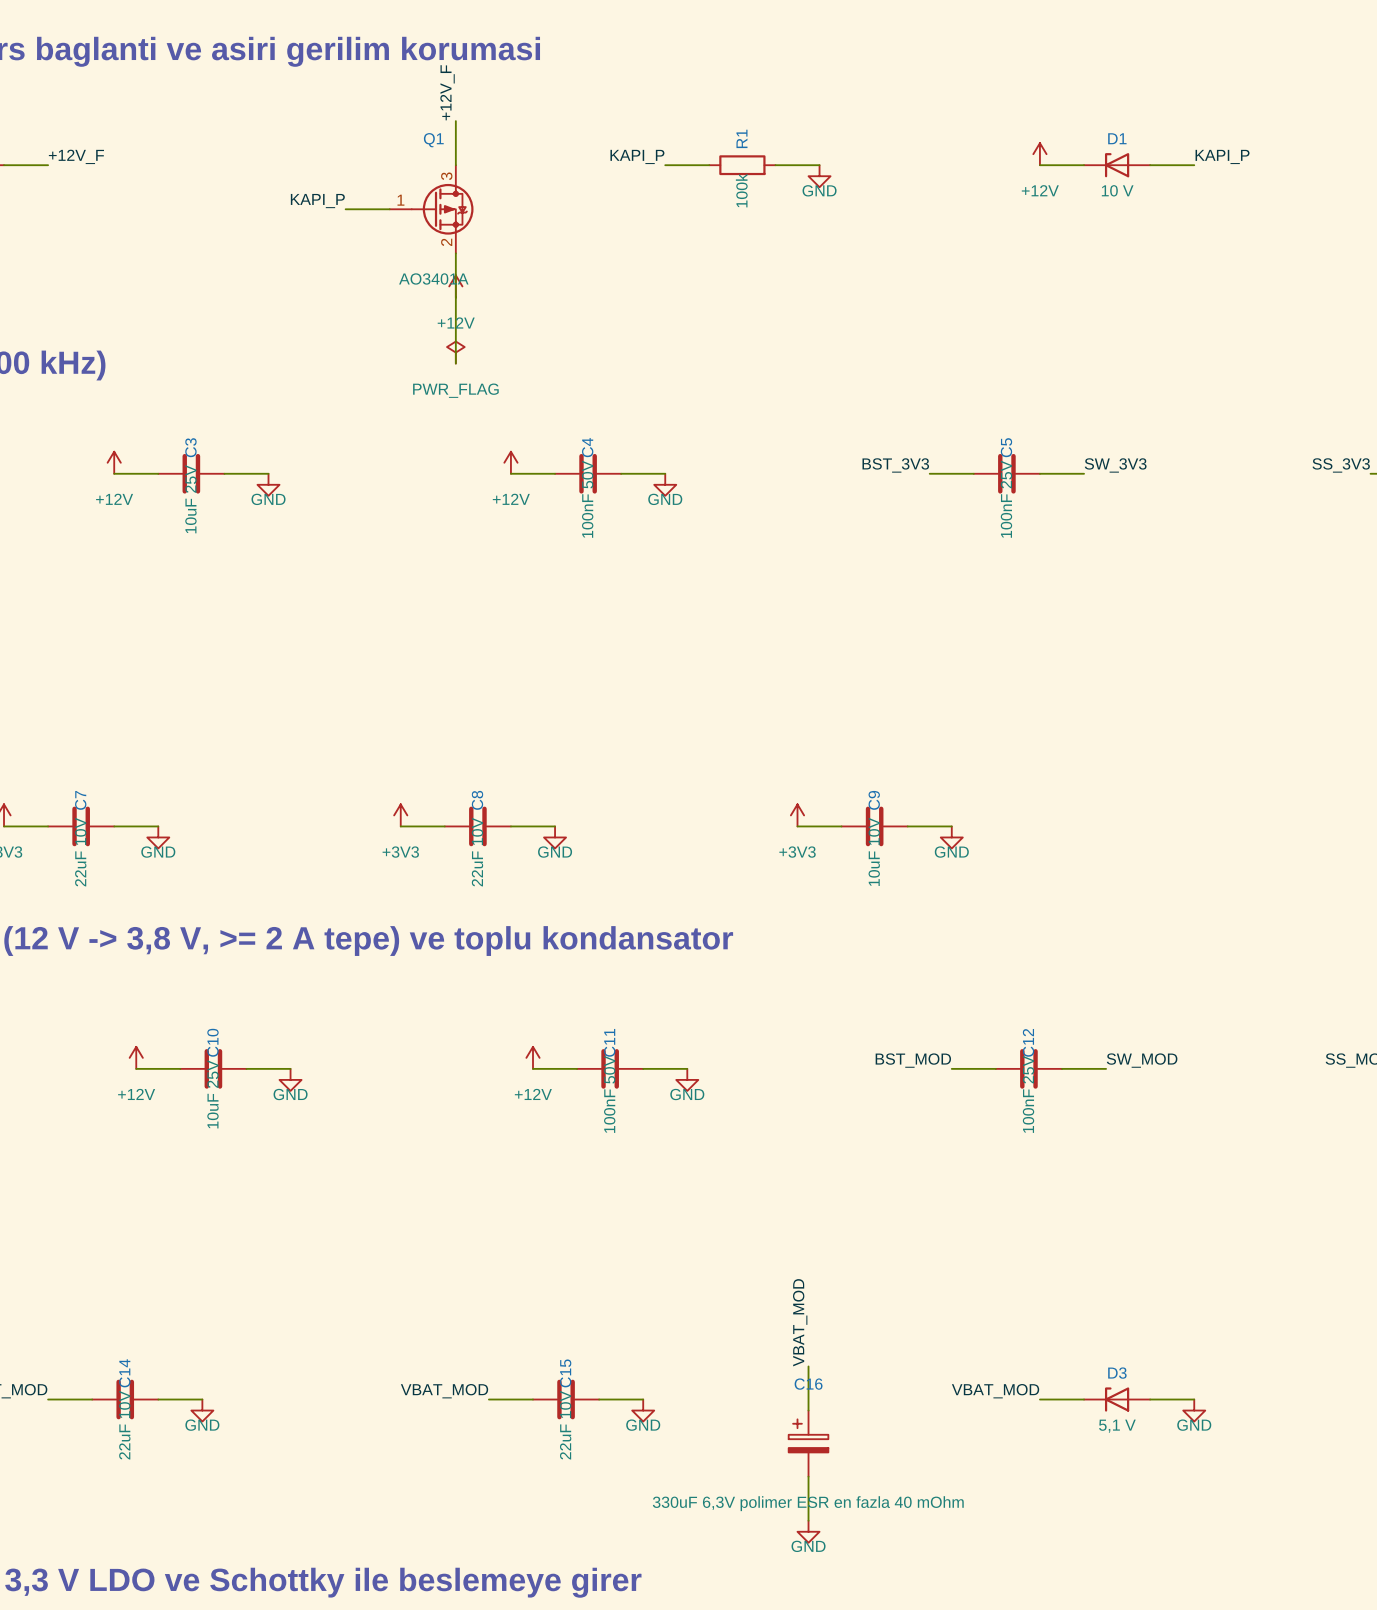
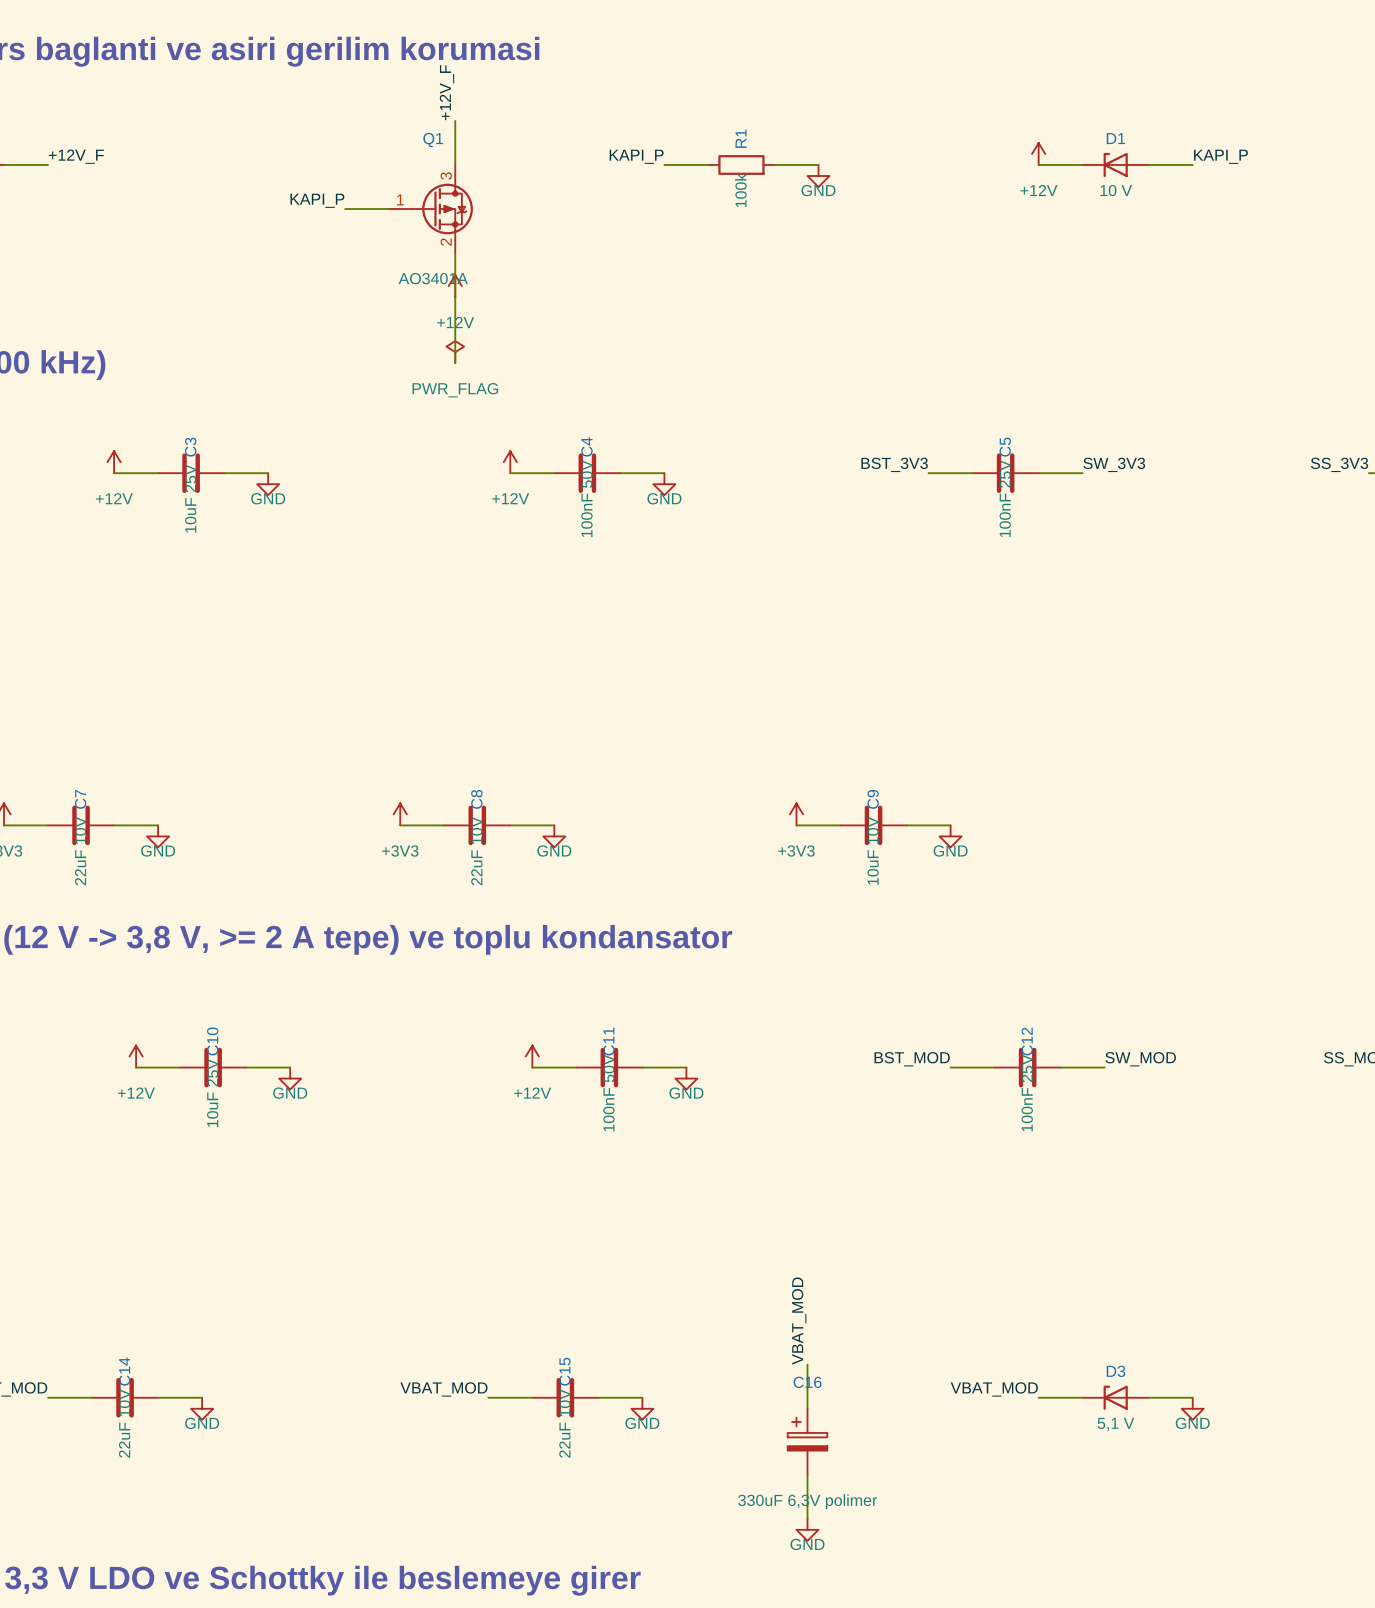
C16 value: 330uF 6,3V polimer ESR en fazla 40 mOhm (808, 1503) -> 330uF 6,3V polimer (807, 1501)

